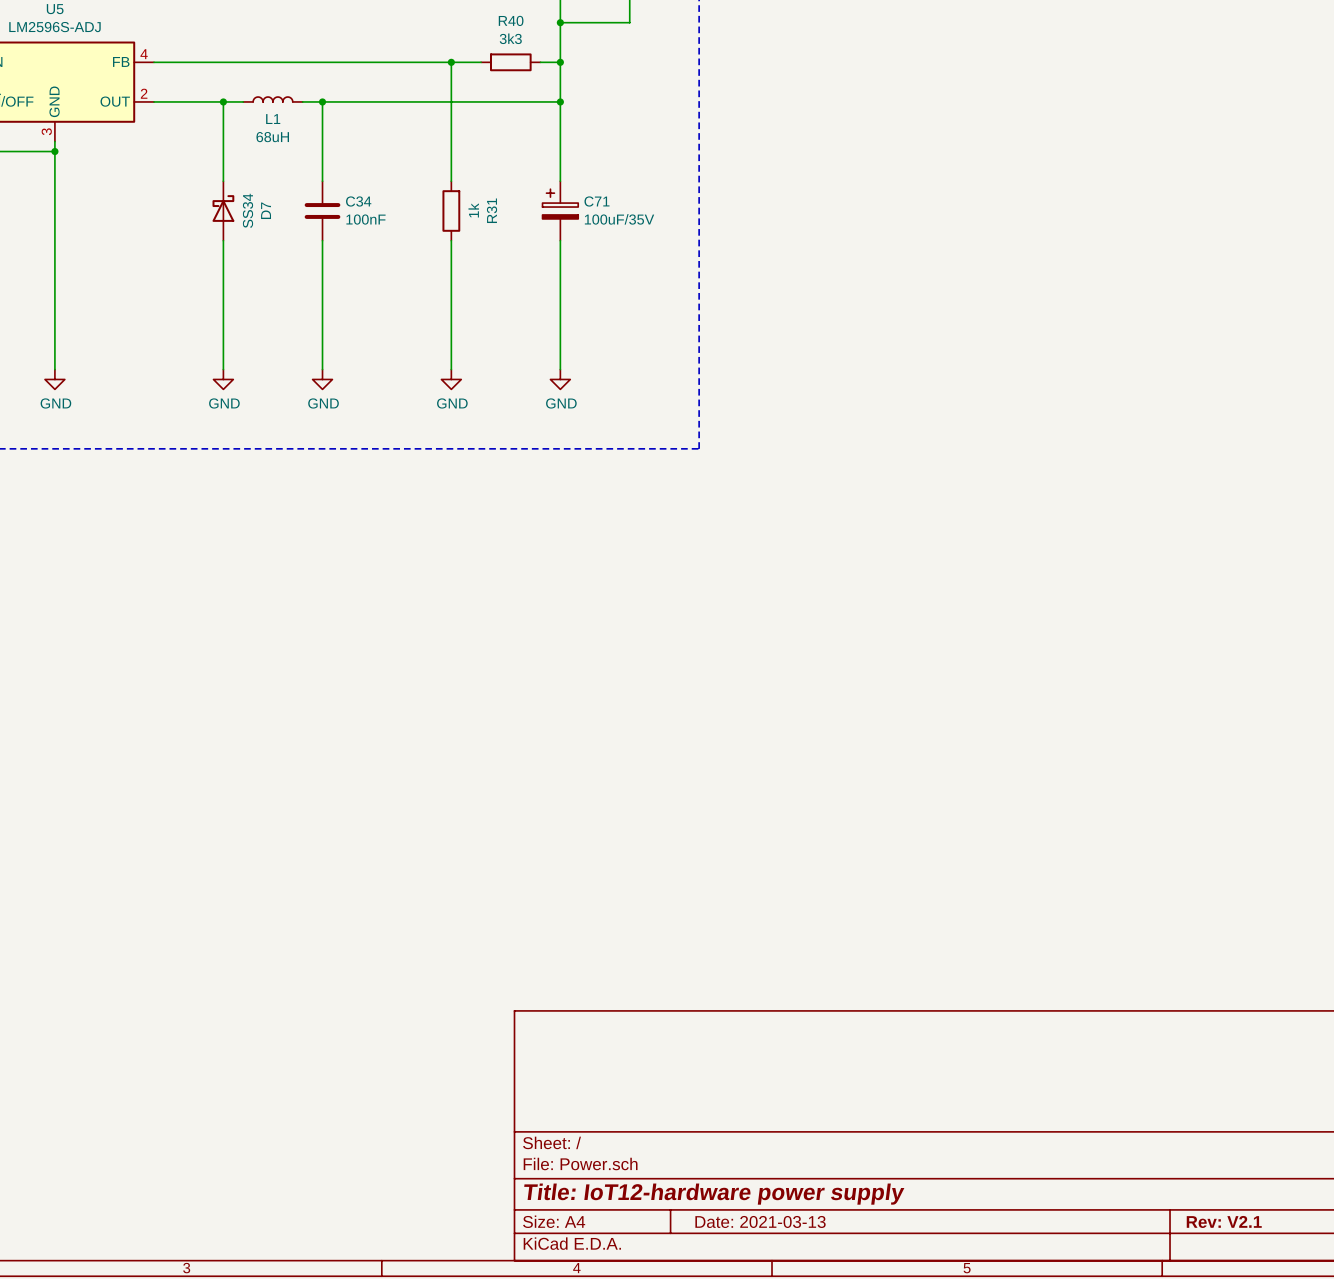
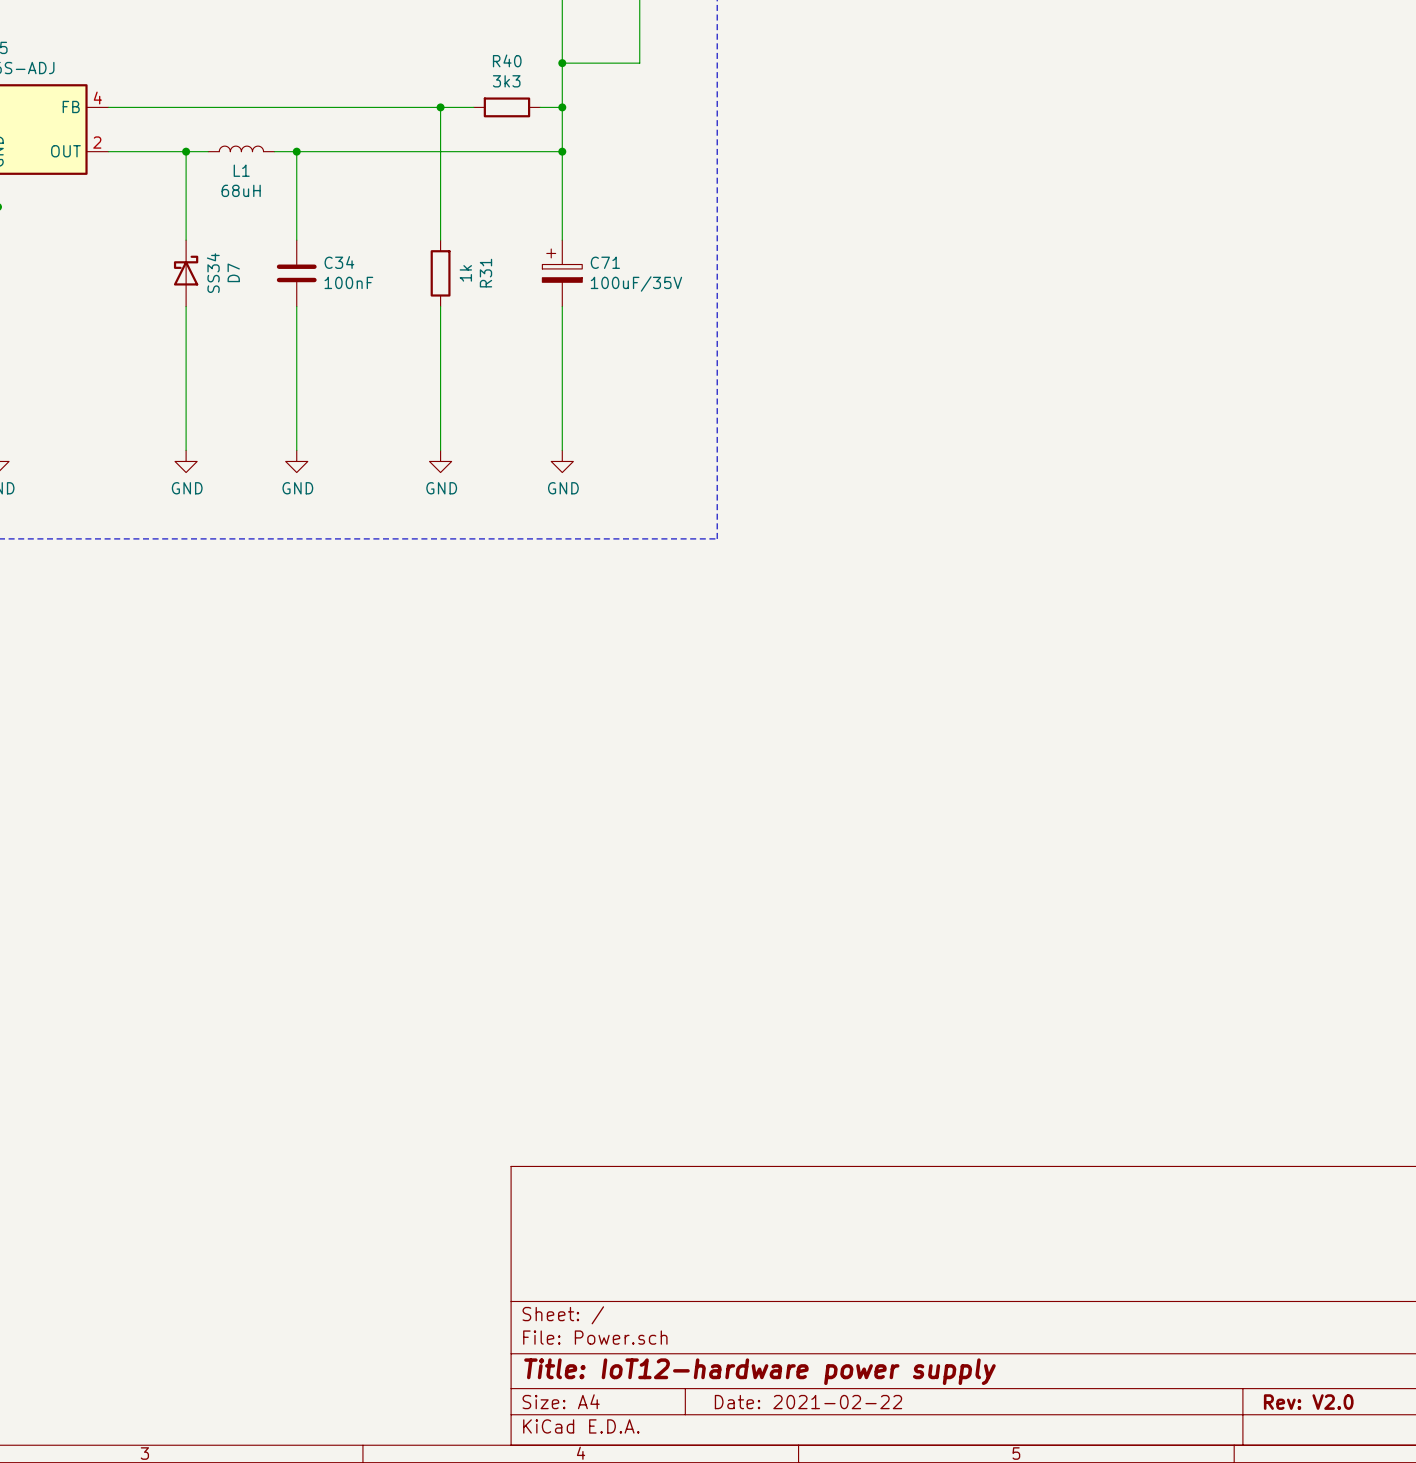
title block: Date: 2021-03-13 (760, 1221) -> Date: 2021-02-22 (808, 1402)
title block: Rev: V2.1 (1224, 1221) -> Rev: V2.0 (1308, 1402)

